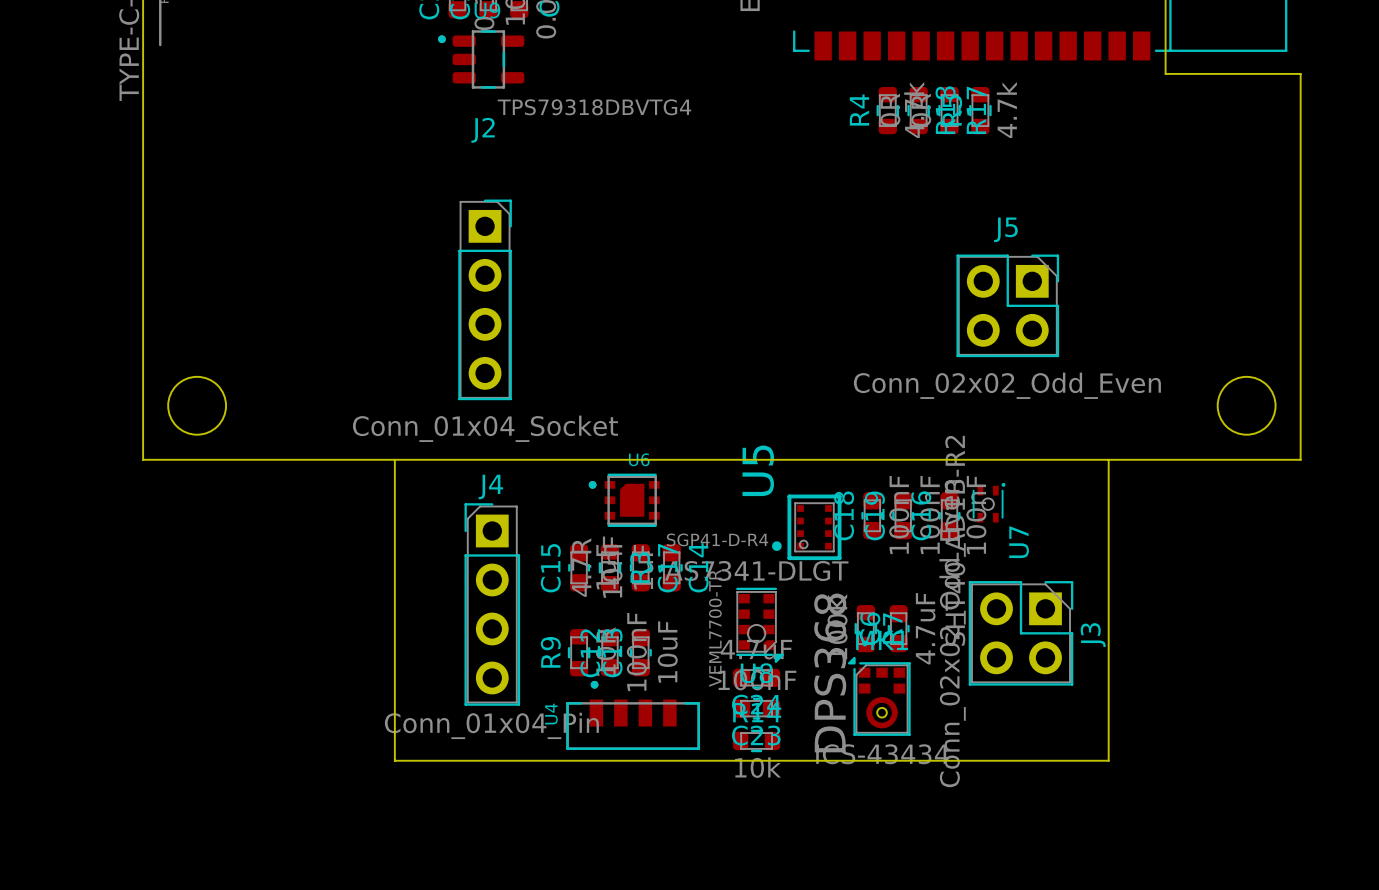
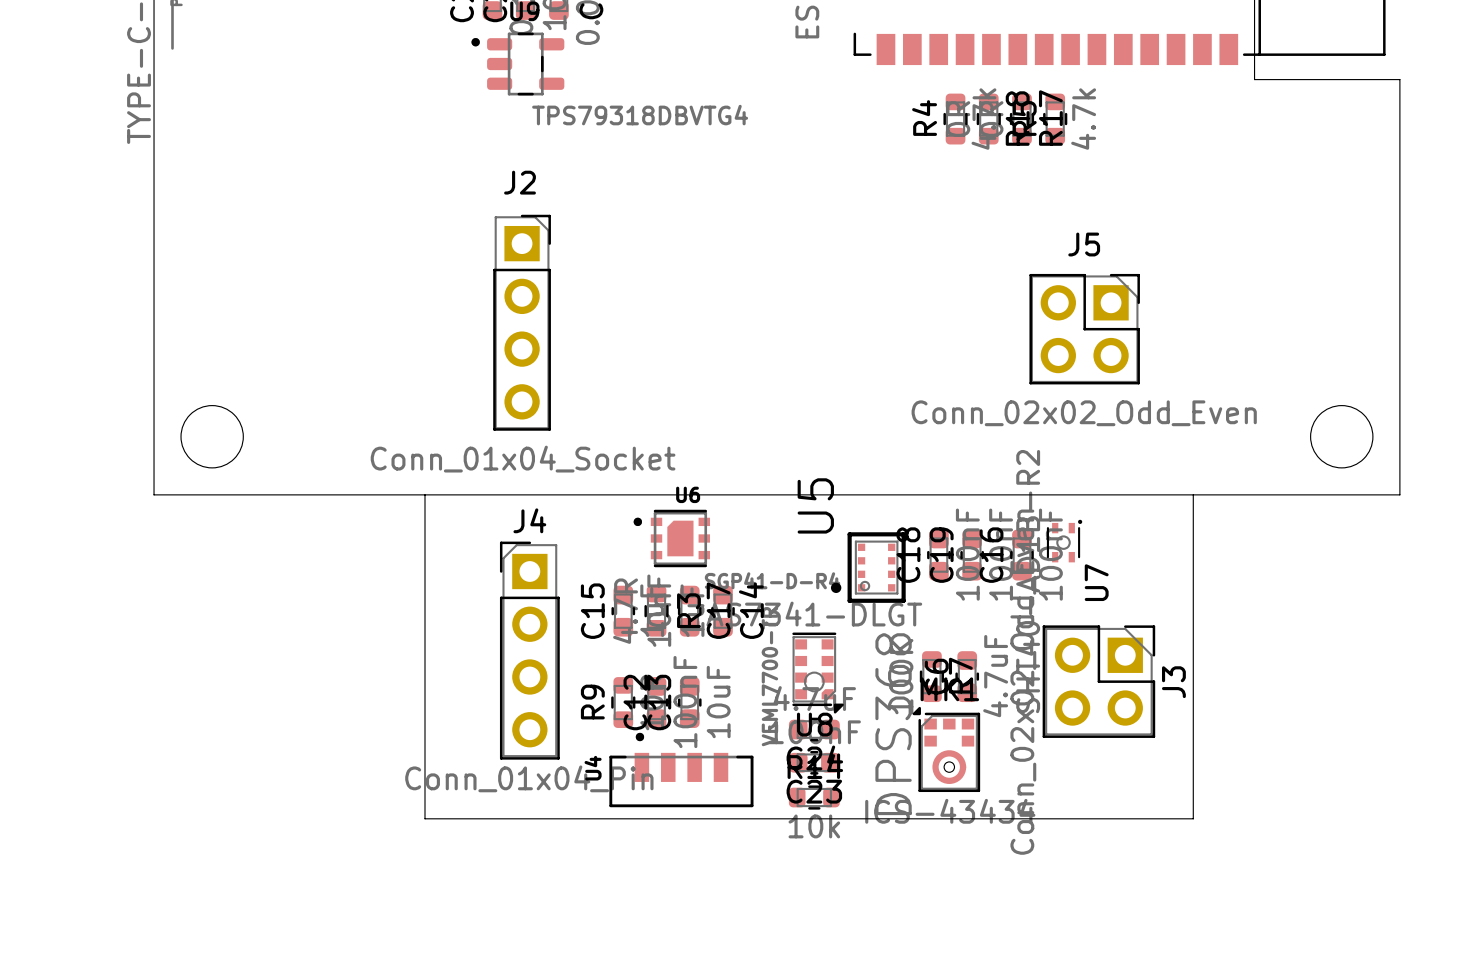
J2 name position: J2 (483, 130) -> J2 (520, 182)

